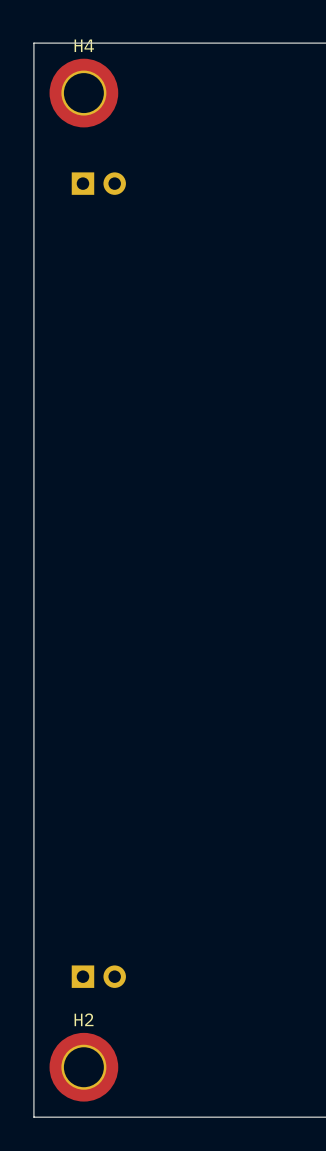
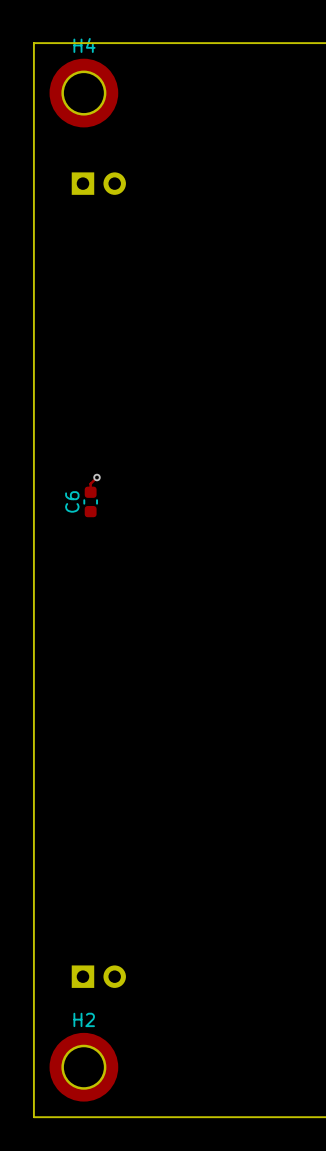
track: none -> (96, 477) (90, 483) (90, 492)
via: none -> (96, 477)
C6: none -> (90, 501)

